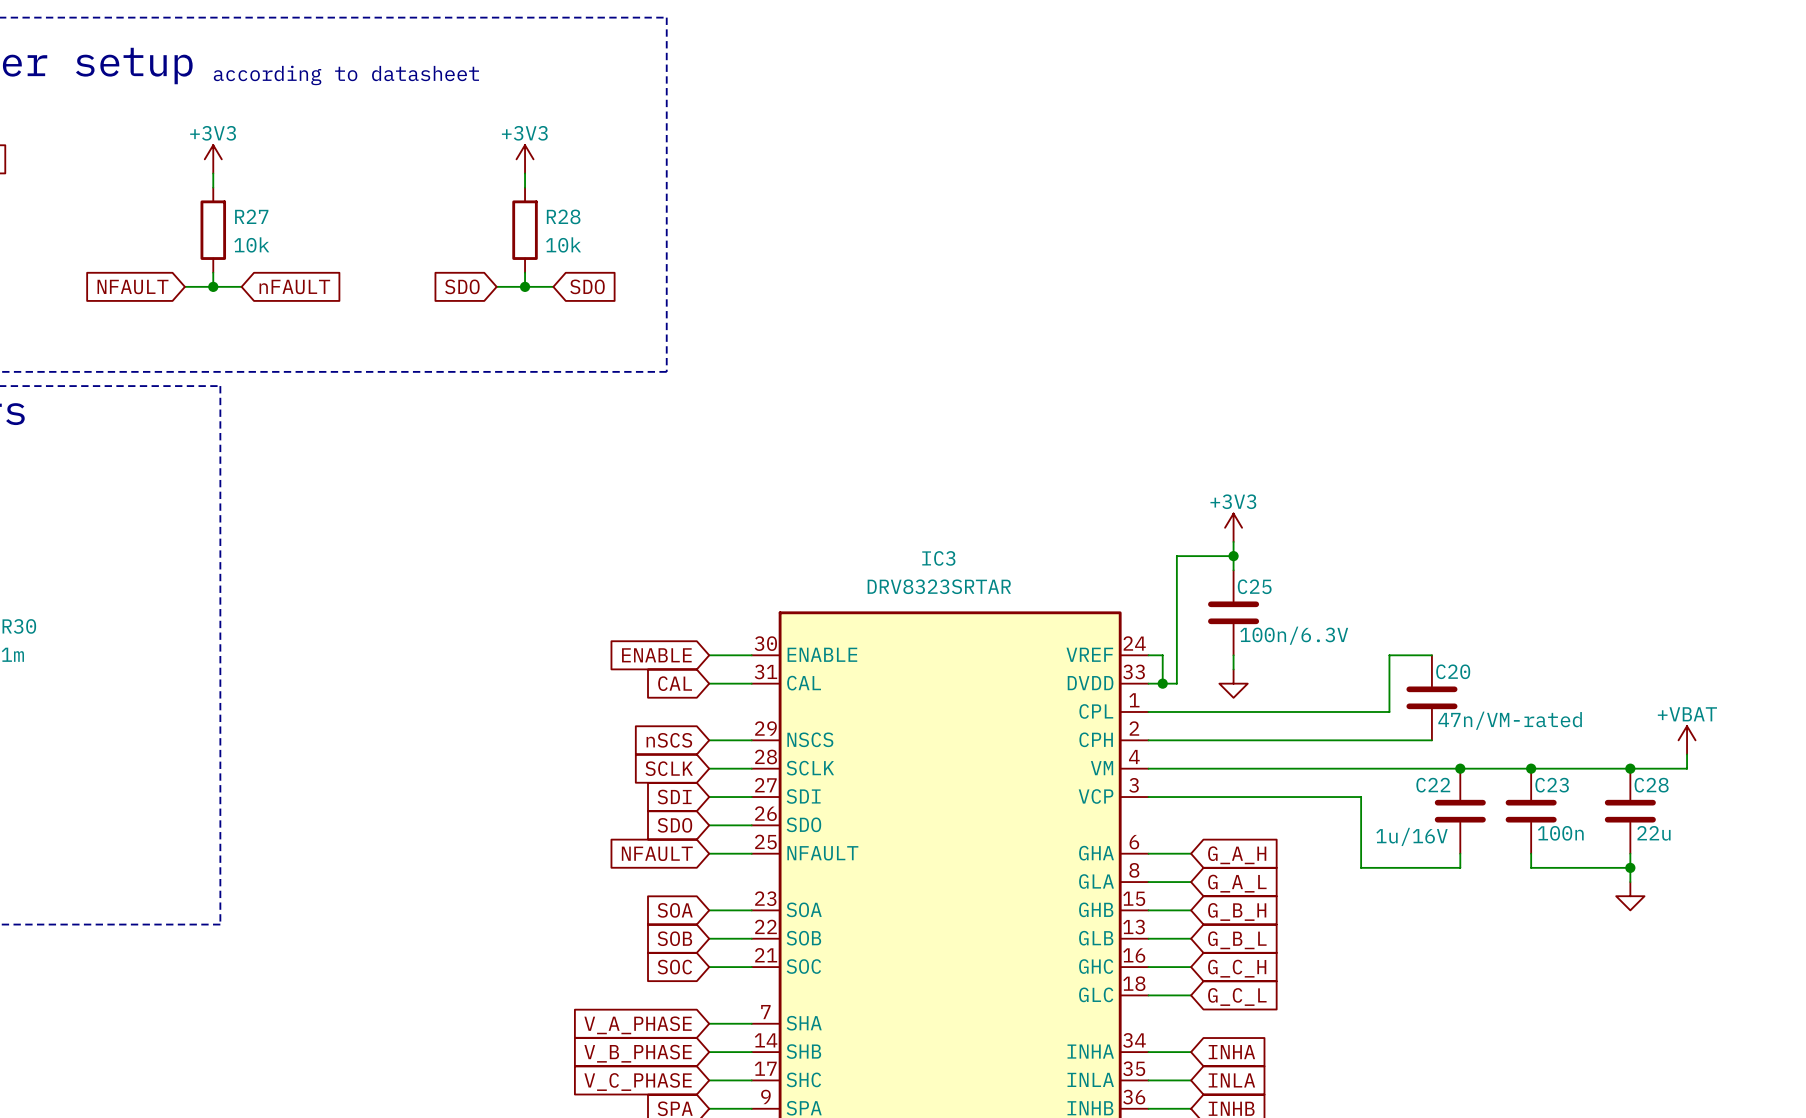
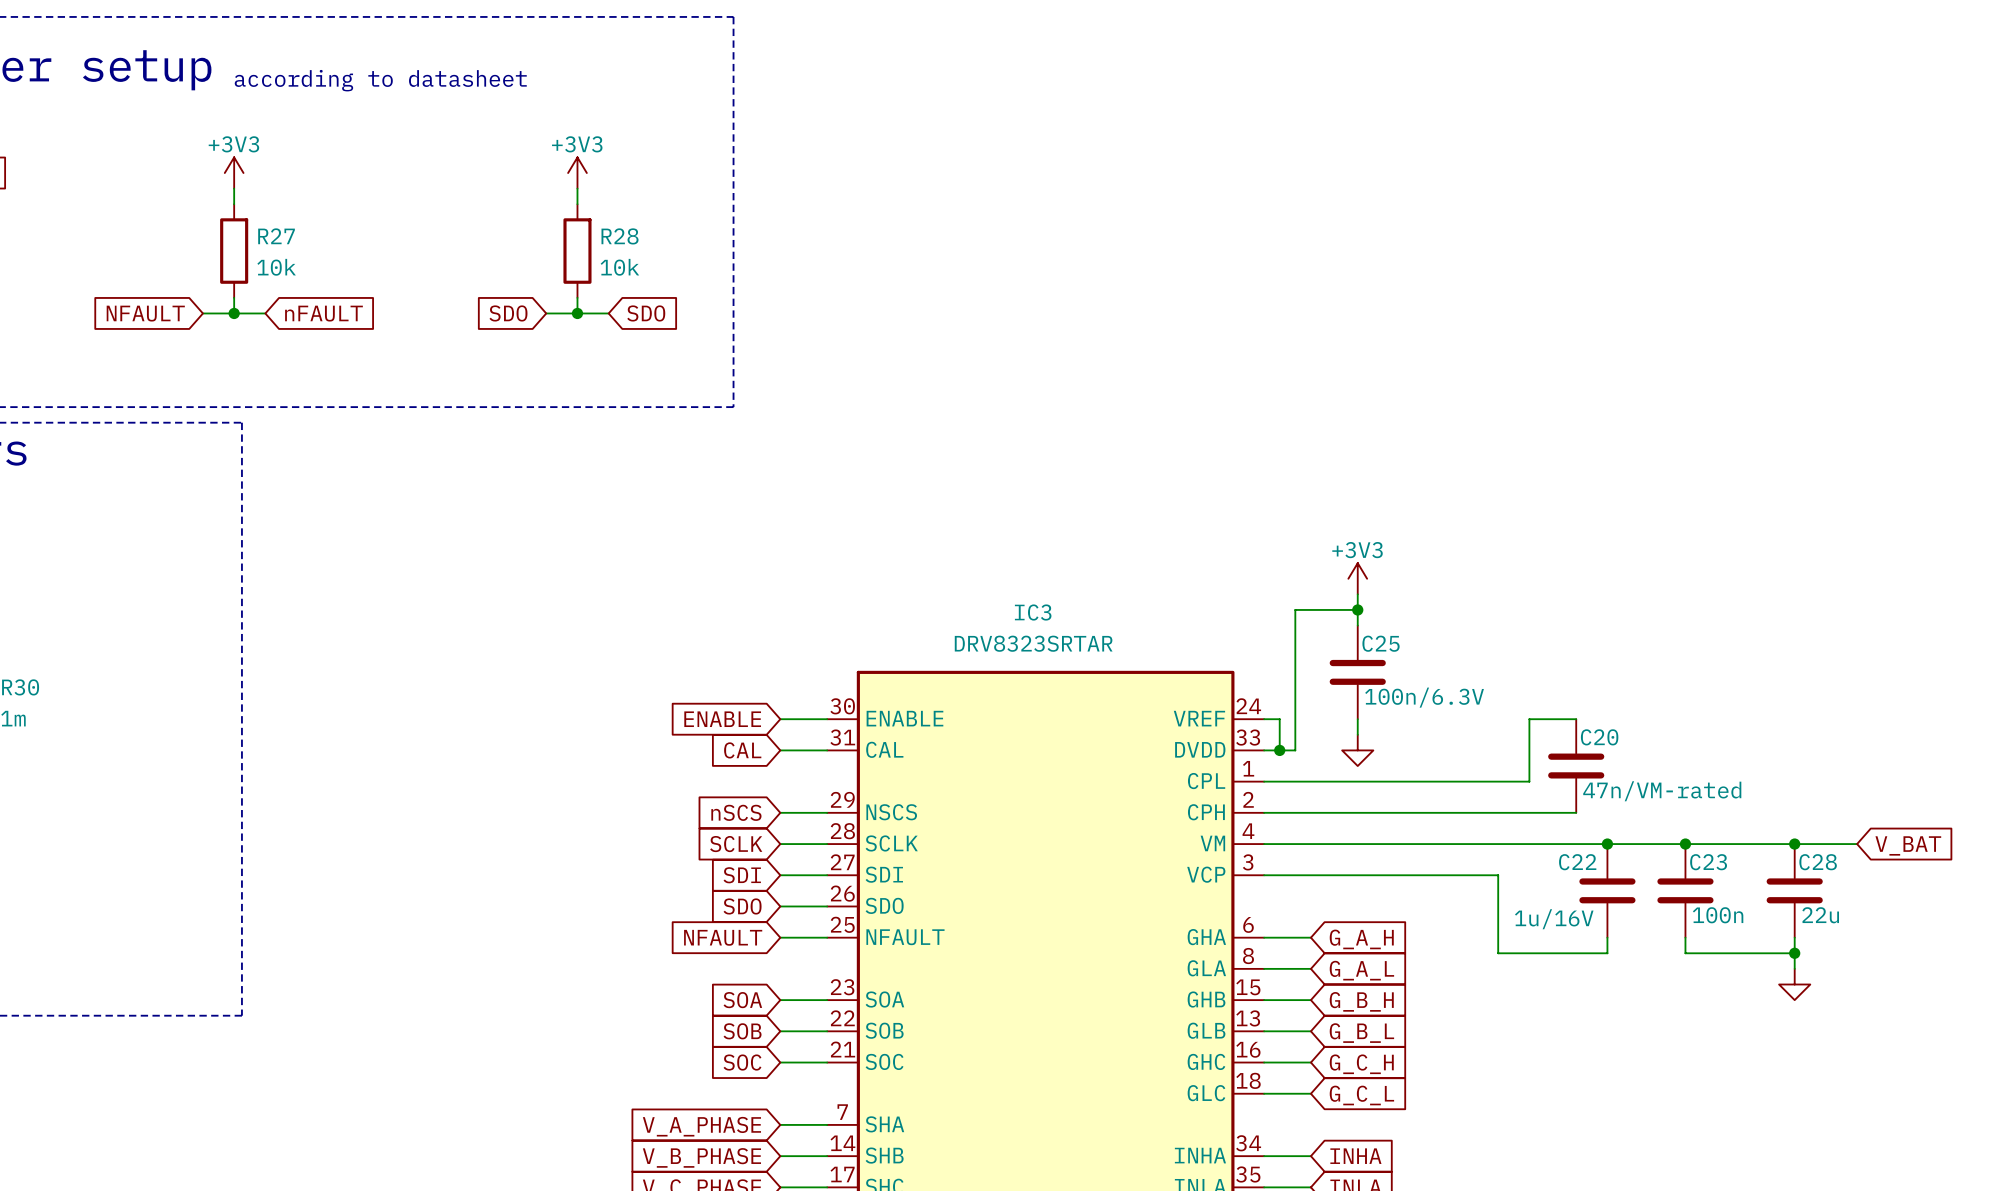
power symbol: +VBAT (1687, 740) -> none
wire: (1687, 754) (1687, 768) -> none
global label: none -> V_BAT (1908, 845)

